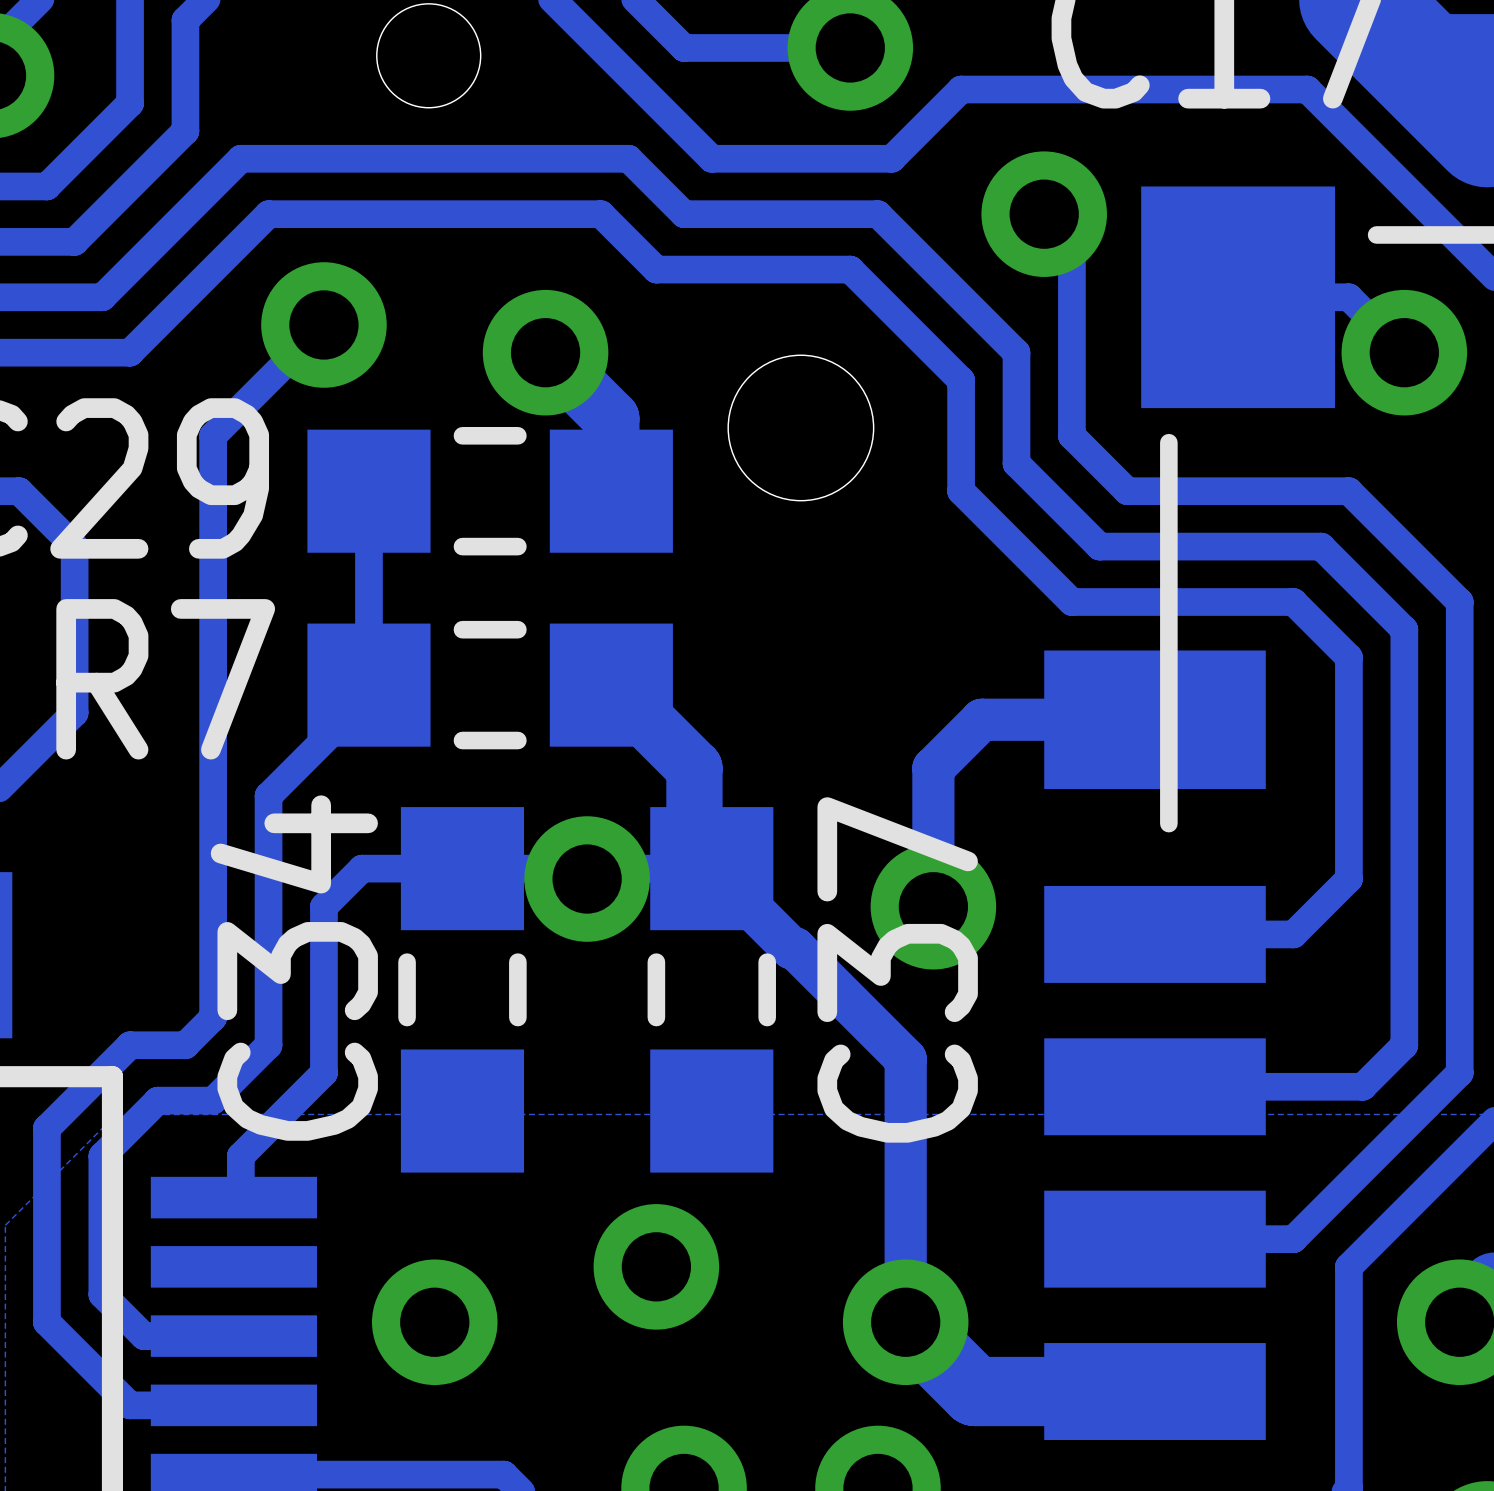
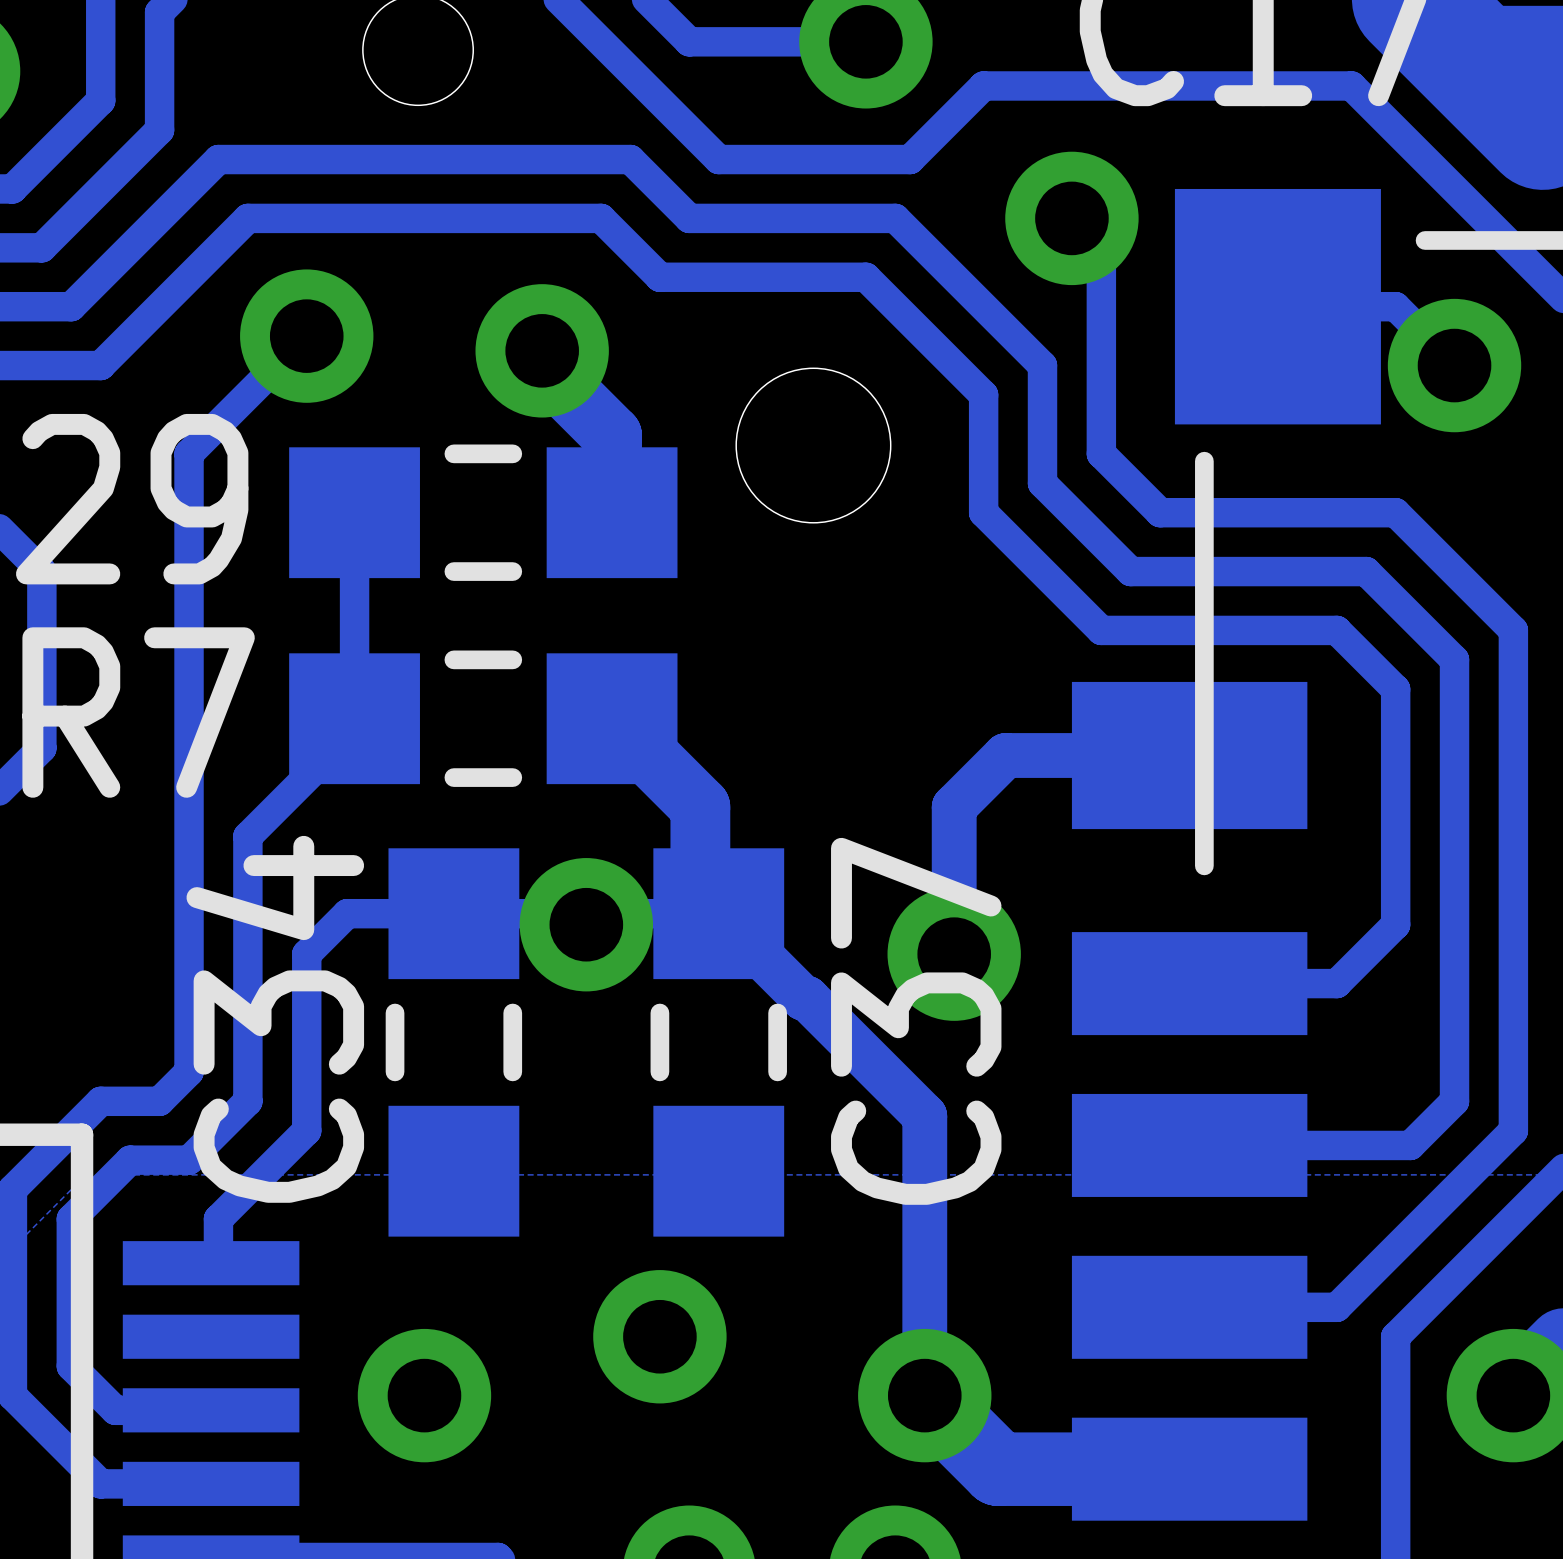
via position: (545, 352) -> (542, 350)

